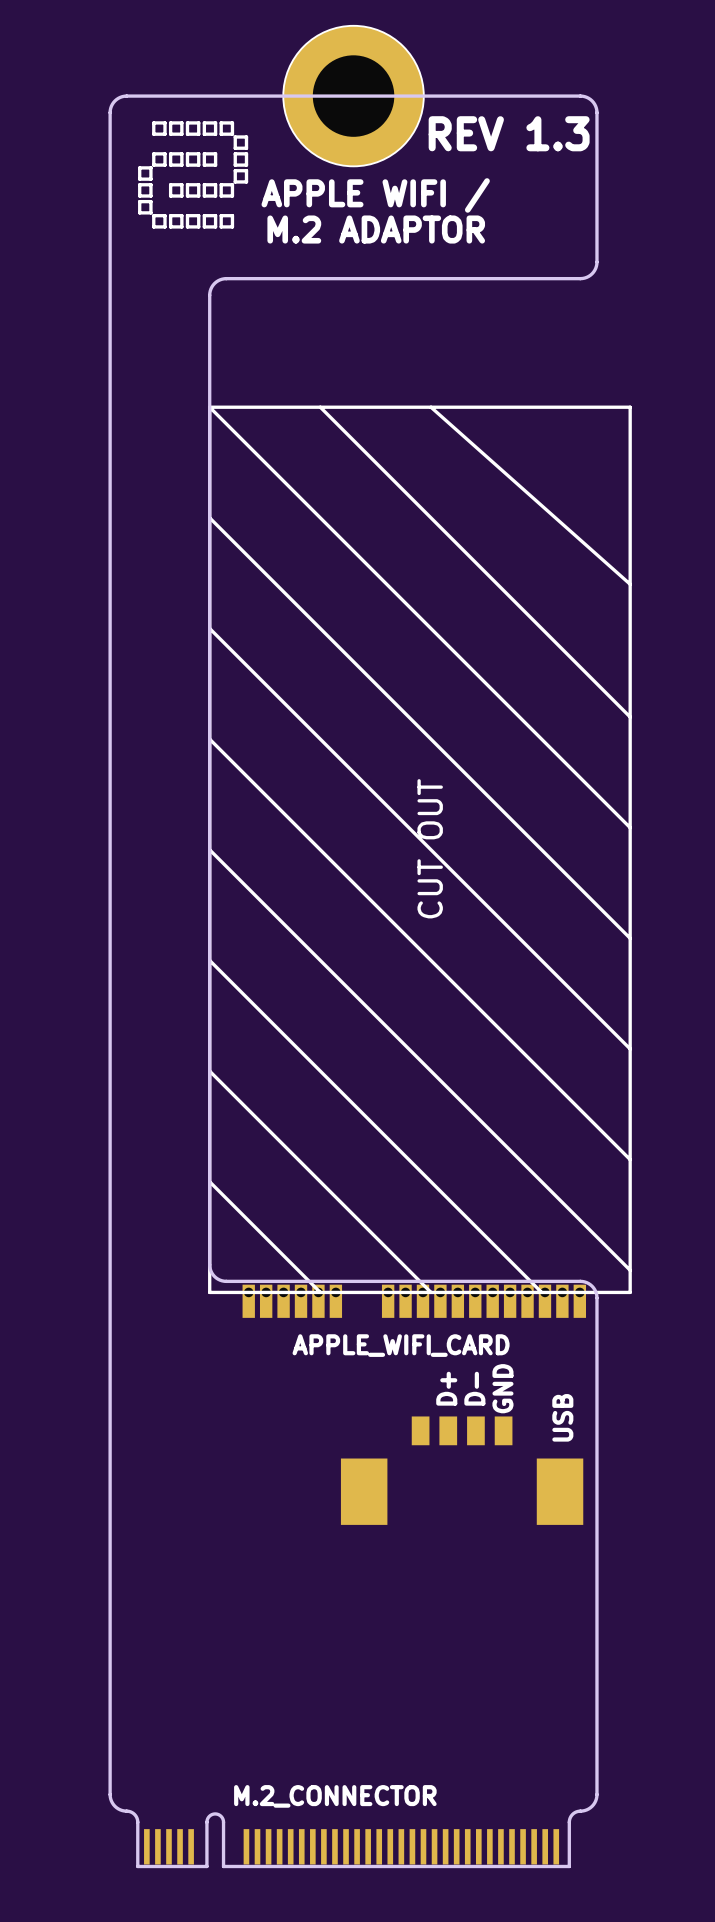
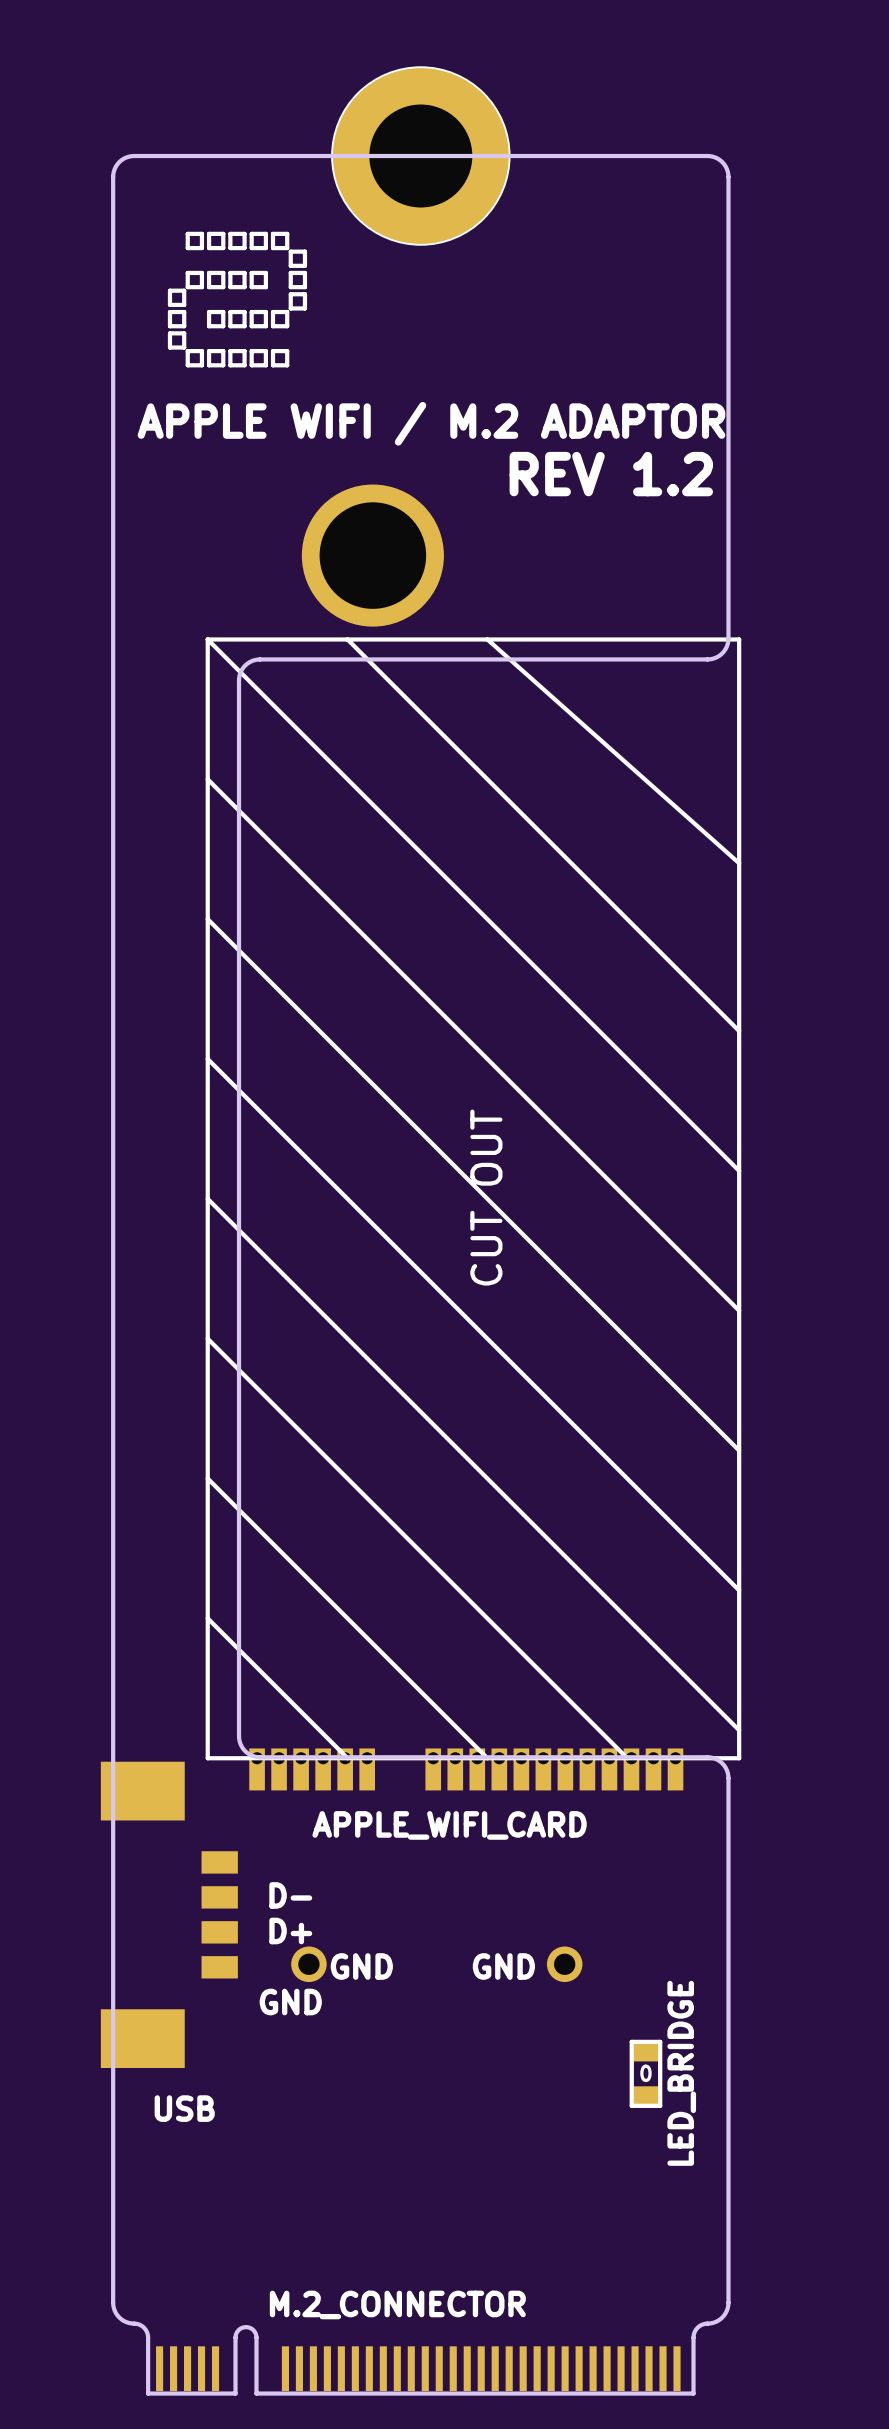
text: REV 1.3 (509, 133) -> none
drawing position: (193, 174) -> (237, 299)
text: APPLE WIFI / (375, 195) -> none
text: M.2 ADAPTOR (376, 229) -> none
board edge: (596, 262) (592, 273) (580, 278) (226, 278) (218, 280) (211, 286) (209, 295) (209, 511) -> (728, 365) (728, 638) (725, 648) (717, 656) (707, 659) (259, 659) (251, 661) (245, 665) (240, 672) (239, 680)
text: none -> APPLE WIFI / M.2 ADAPTOR (431, 423)
text: none -> REV 1.2 (611, 474)
part: APPLE_WIFI_CARD (419, 861) -> none
part: none -> APPLE_WIFI_CARD (473, 1233)
board edge: (209, 1264) (214, 1276) (226, 1281) (584, 1281) (593, 1287) (596, 1295) (596, 1379) -> (239, 1633) (239, 1739) (243, 1749) (254, 1756) (707, 1757) (715, 1758) (722, 1763) (726, 1770) (728, 1778)
text rotation: 0° (446, 1388) -> 90° clockwise (290, 1930)
text position: D+ (446, 1388) -> D+ (290, 1930)
text rotation: 0° (474, 1388) -> 90° clockwise (290, 1895)
text position: D- (474, 1388) -> D- (290, 1895)
text: GND (502, 1388) -> none
part value position: USB (562, 1417) -> USB (184, 2108)
part rotation: 0° (462, 1470) -> 90° clockwise (169, 1914)
part position: (462, 1470) -> (169, 1914)
text: none -> GND (361, 1966)
text: none -> GND (503, 1966)
text: none -> GND (290, 2002)
part: none -> 0 (645, 2073)
text: none -> LED_BRIDGE (681, 2073)

